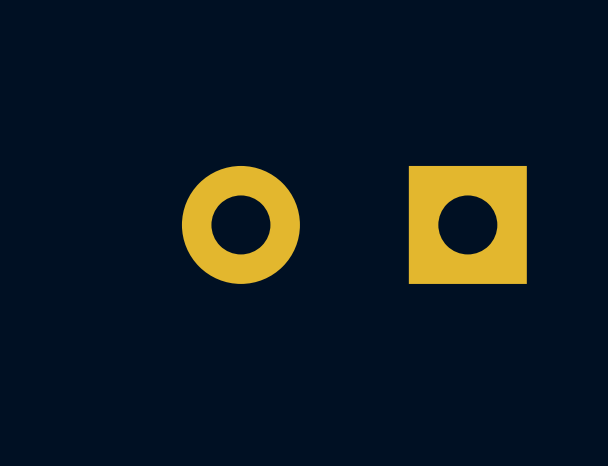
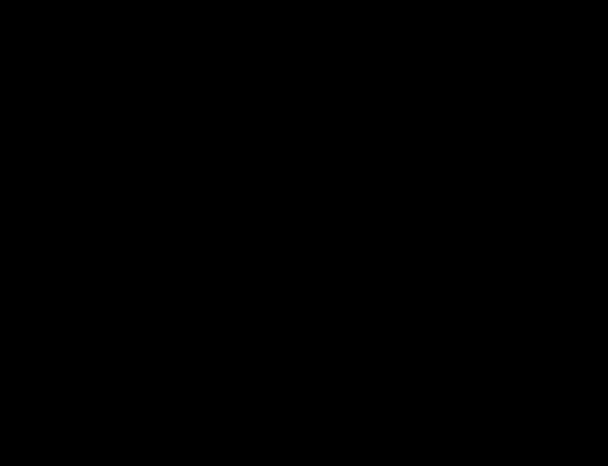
part: (354, 224) -> none

